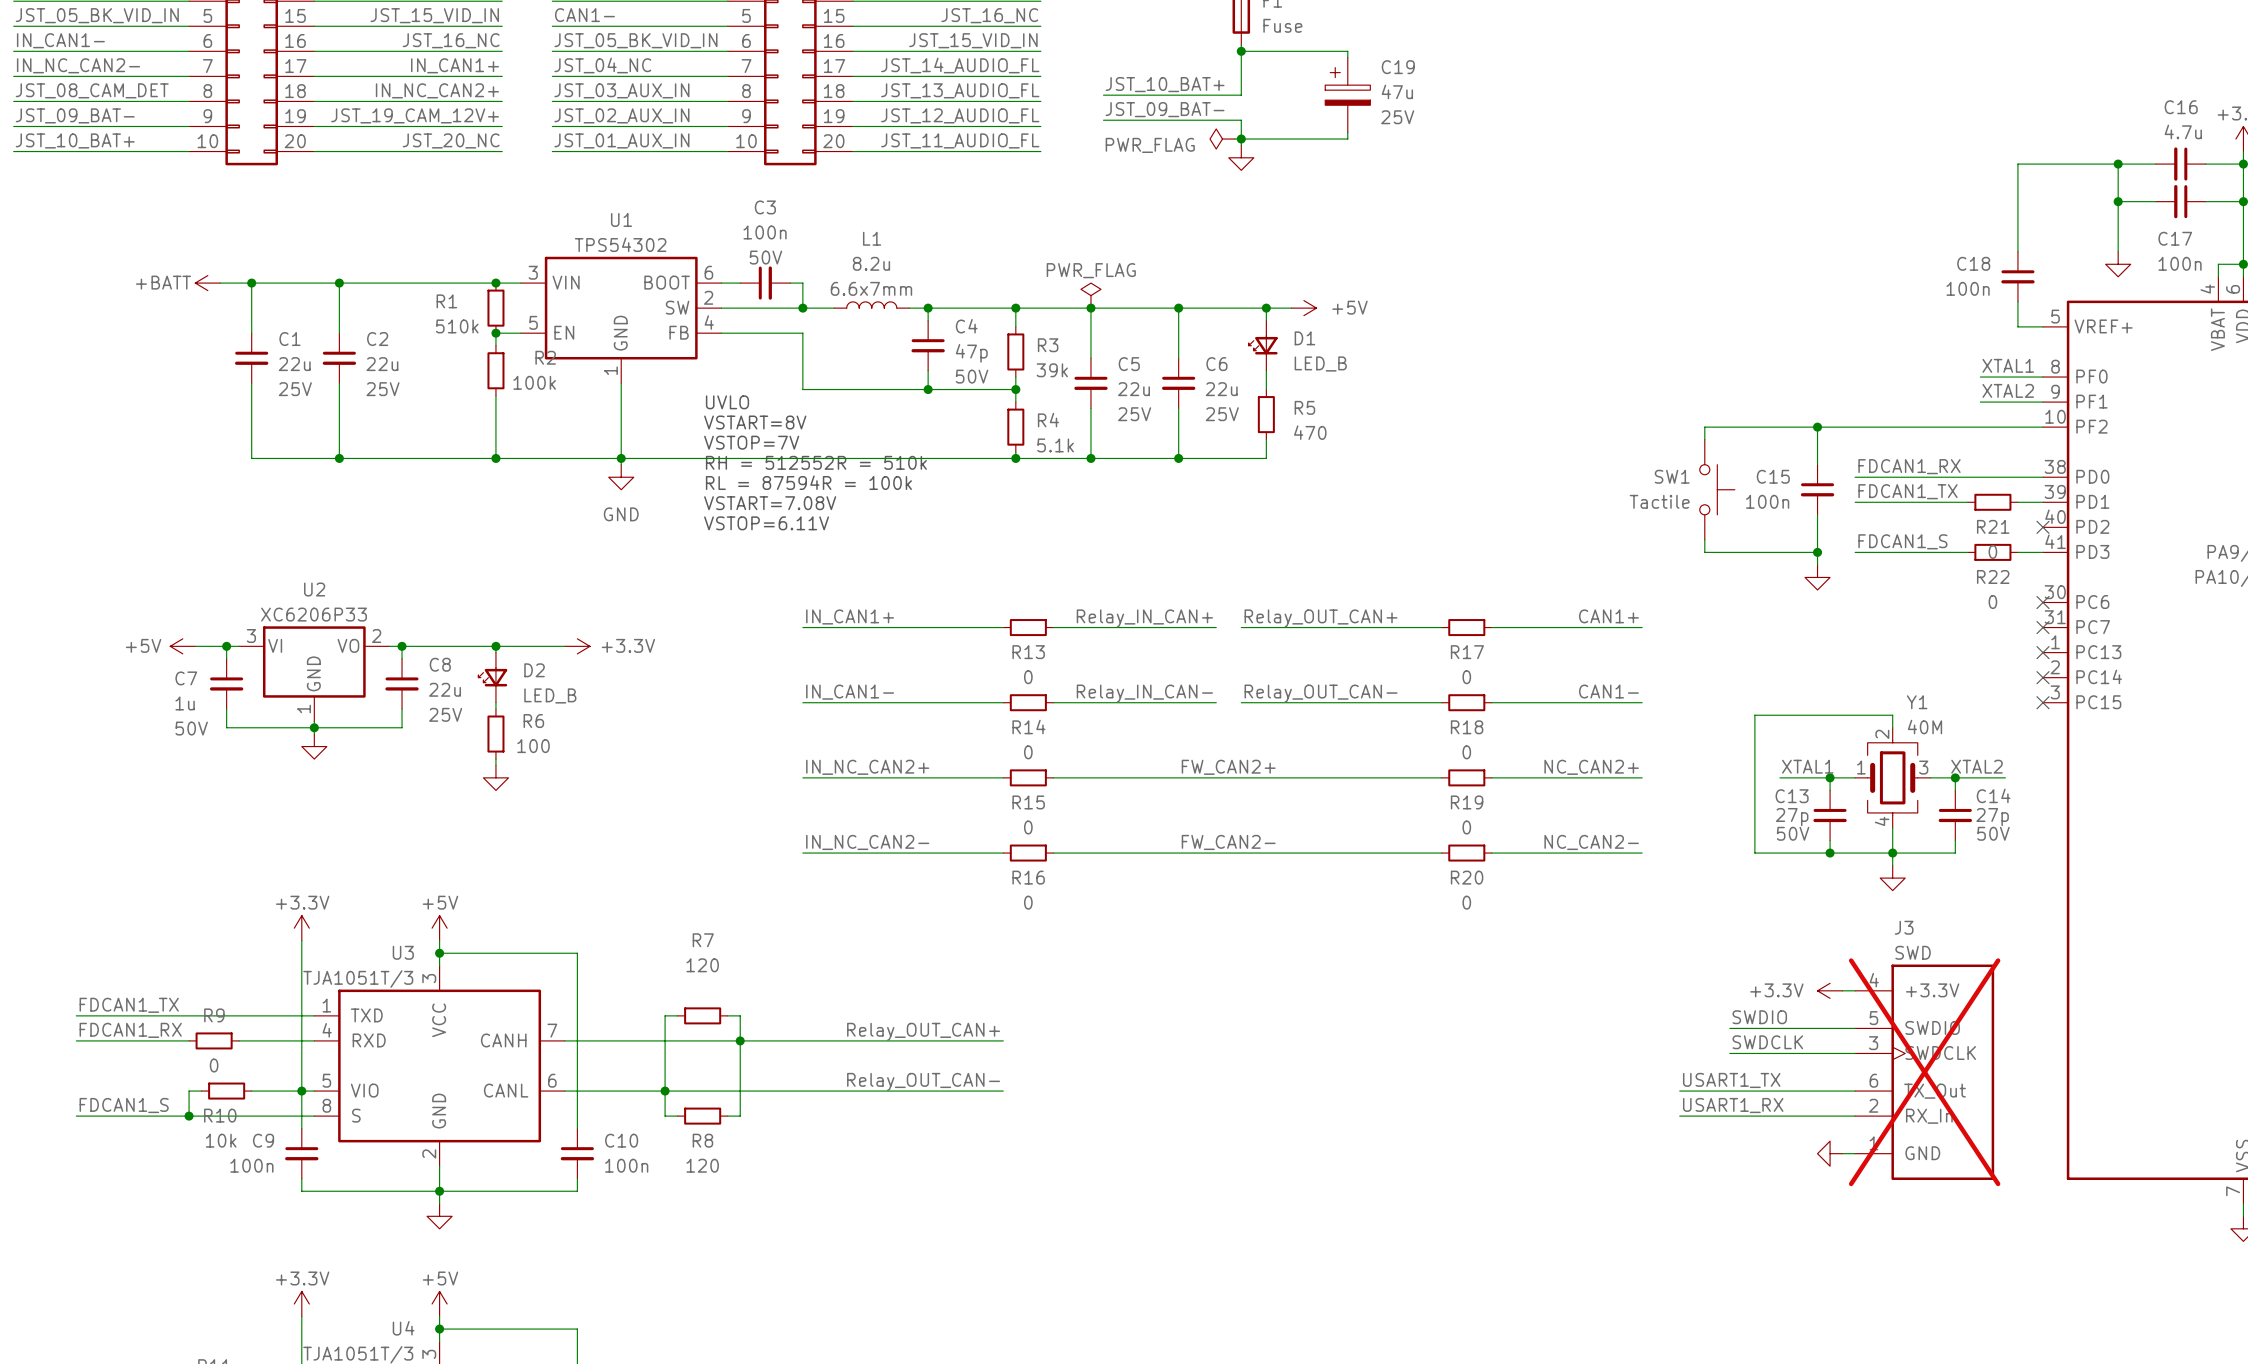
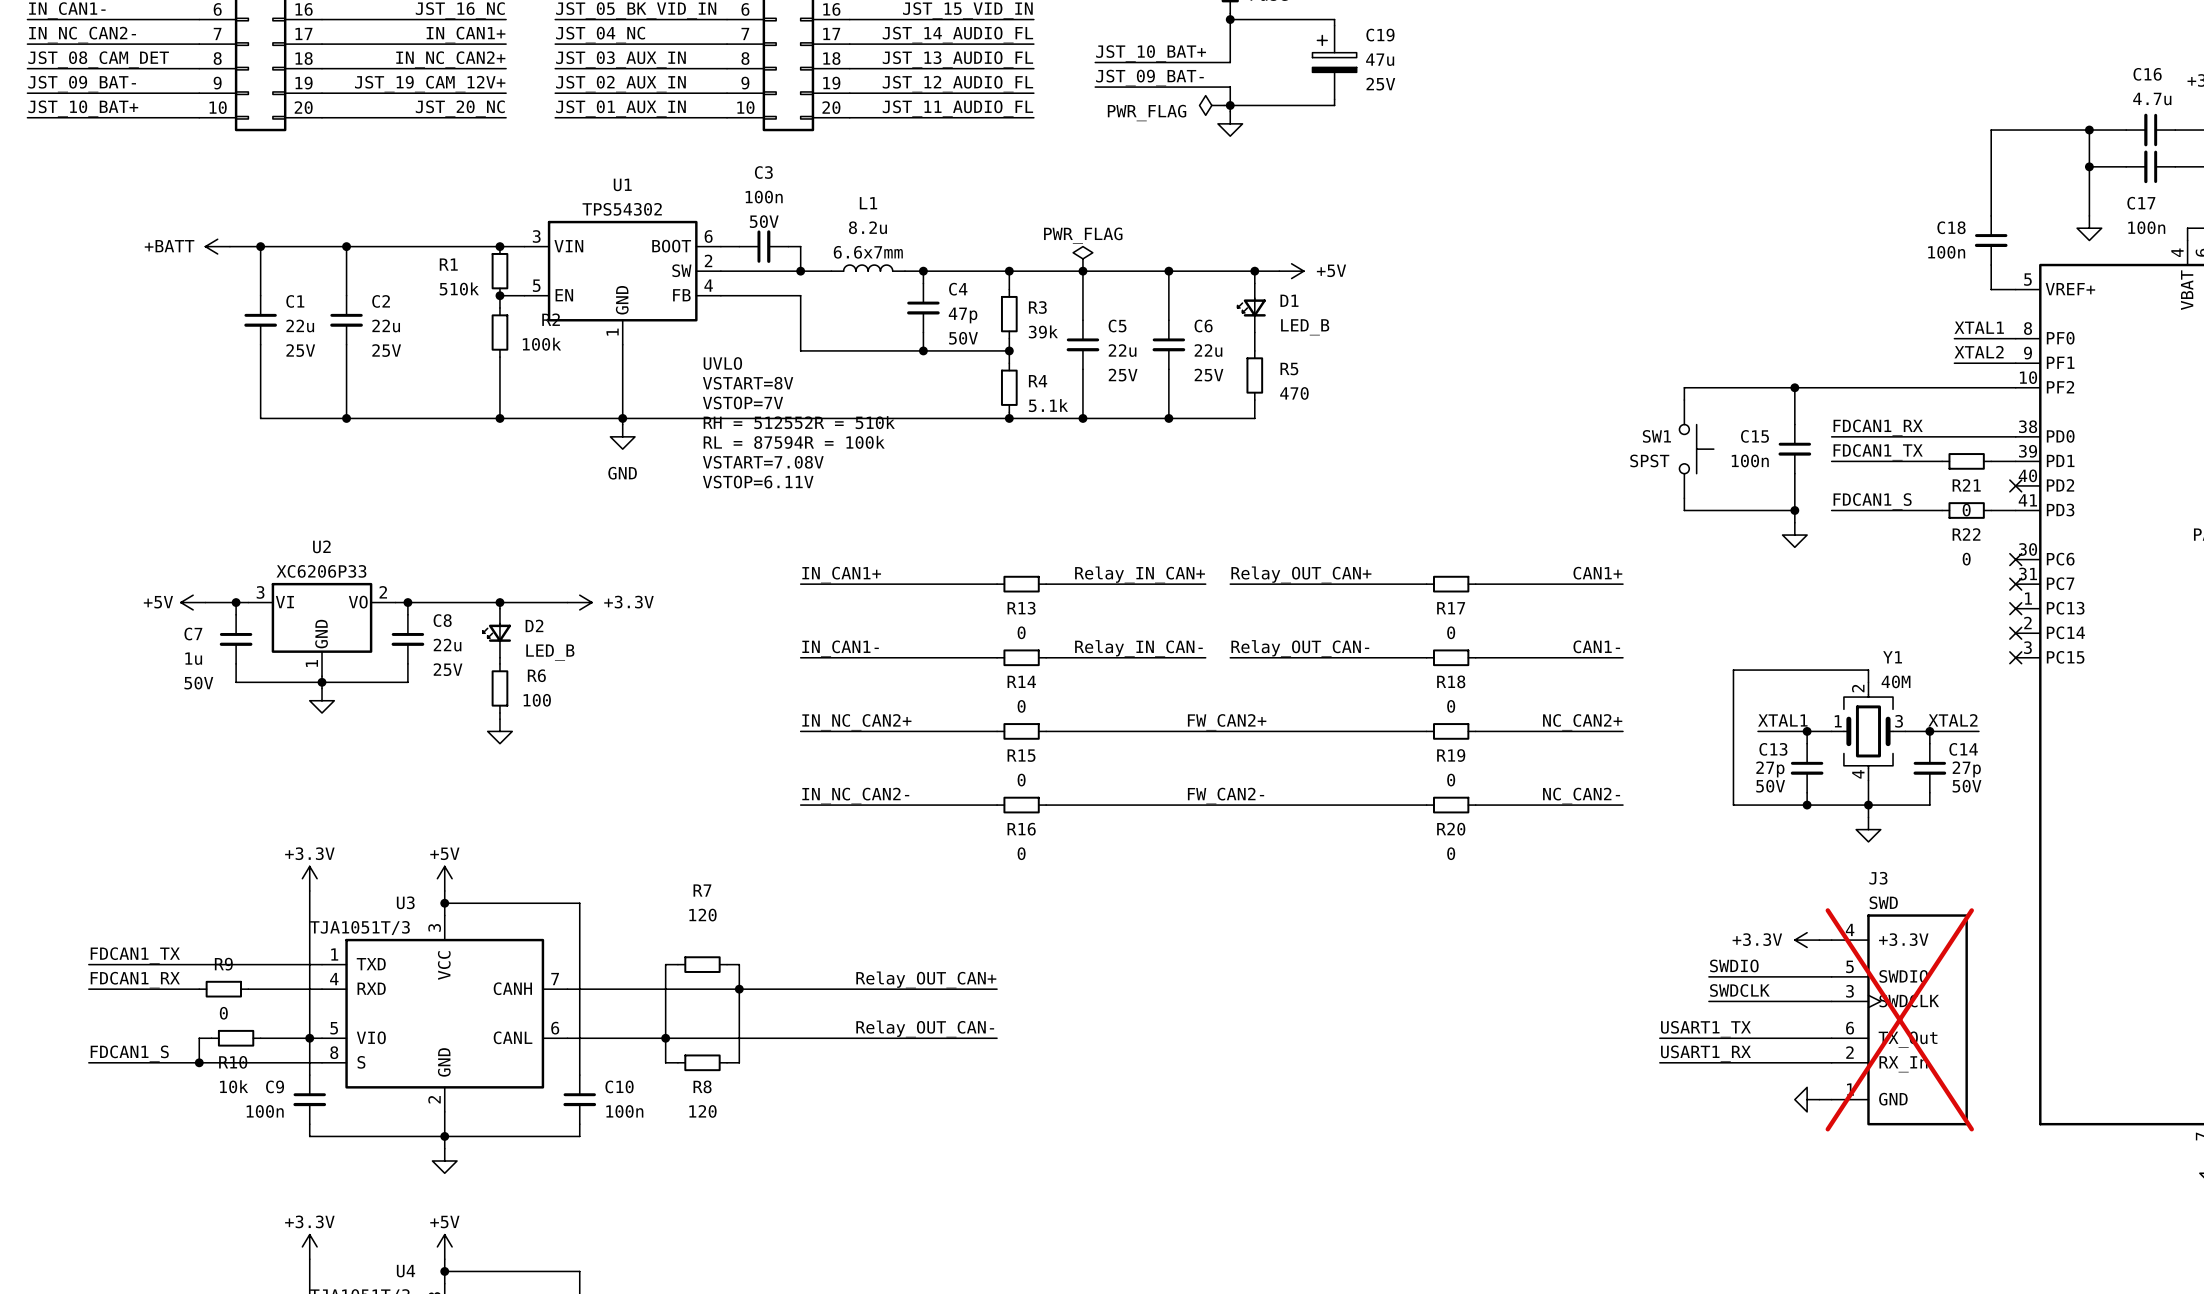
SW1 value: Tactile (1659, 501) -> SPST (1649, 460)

